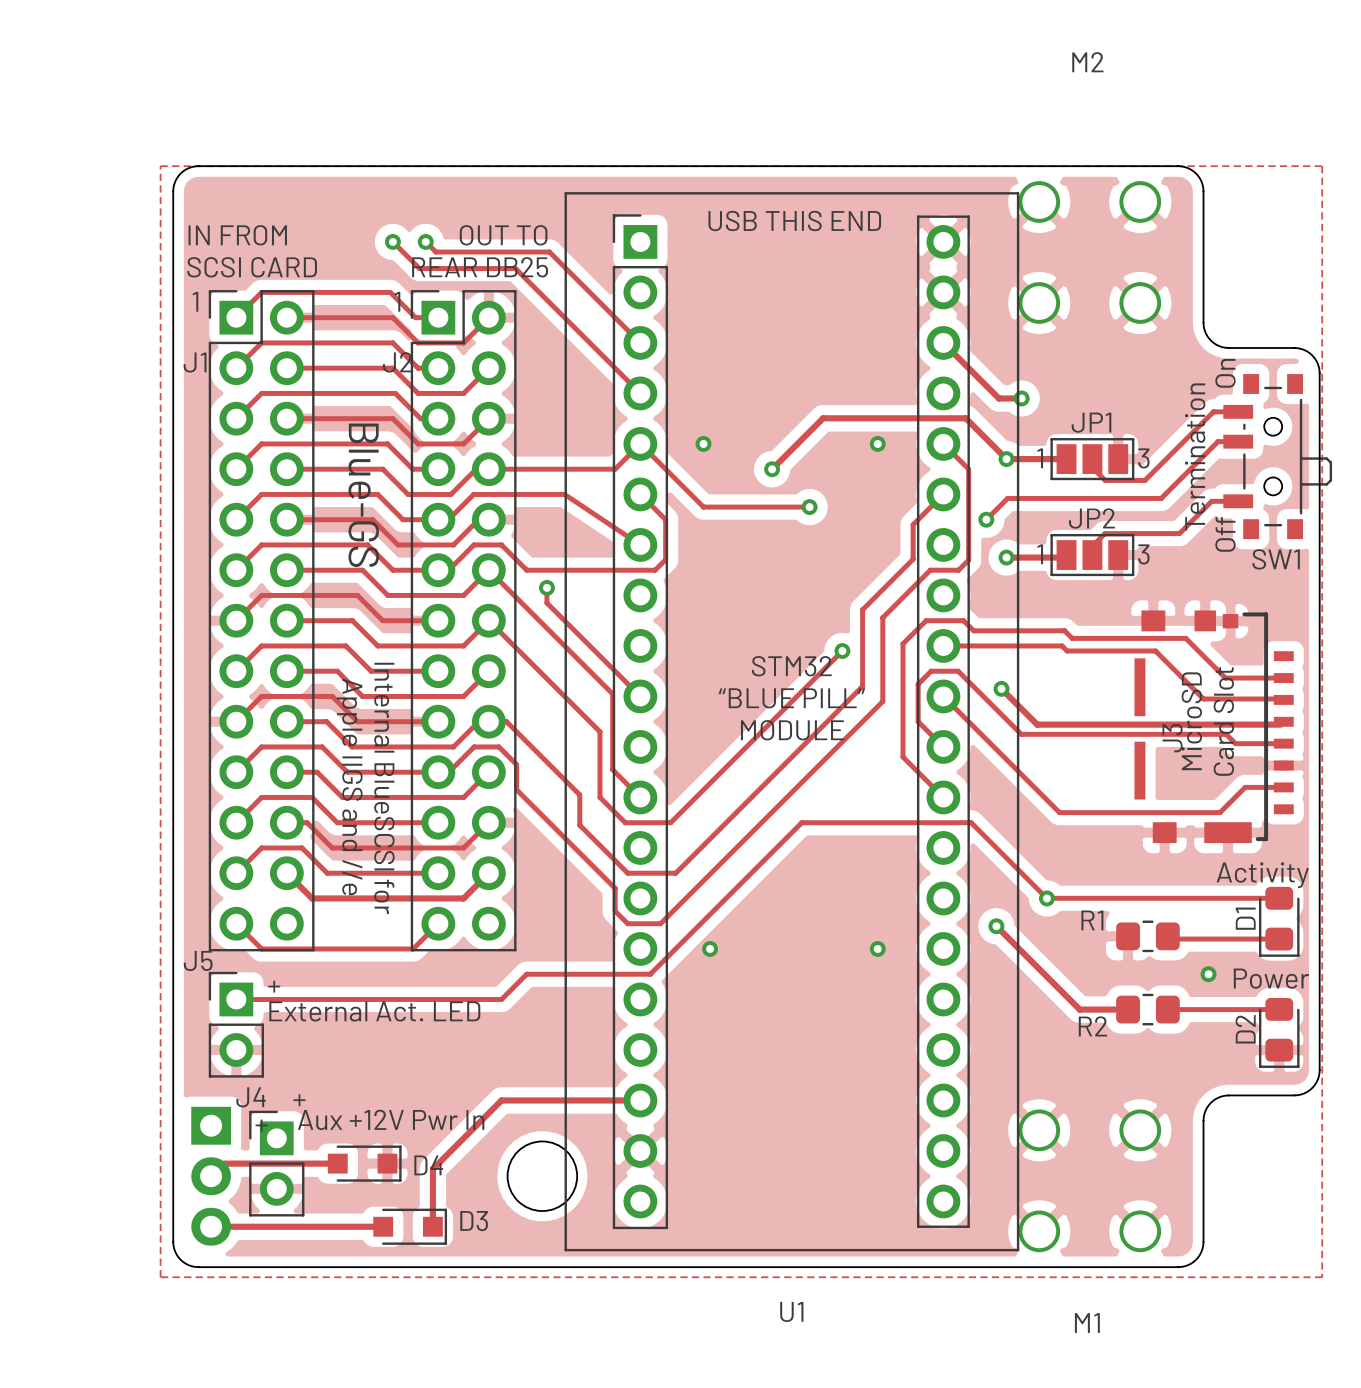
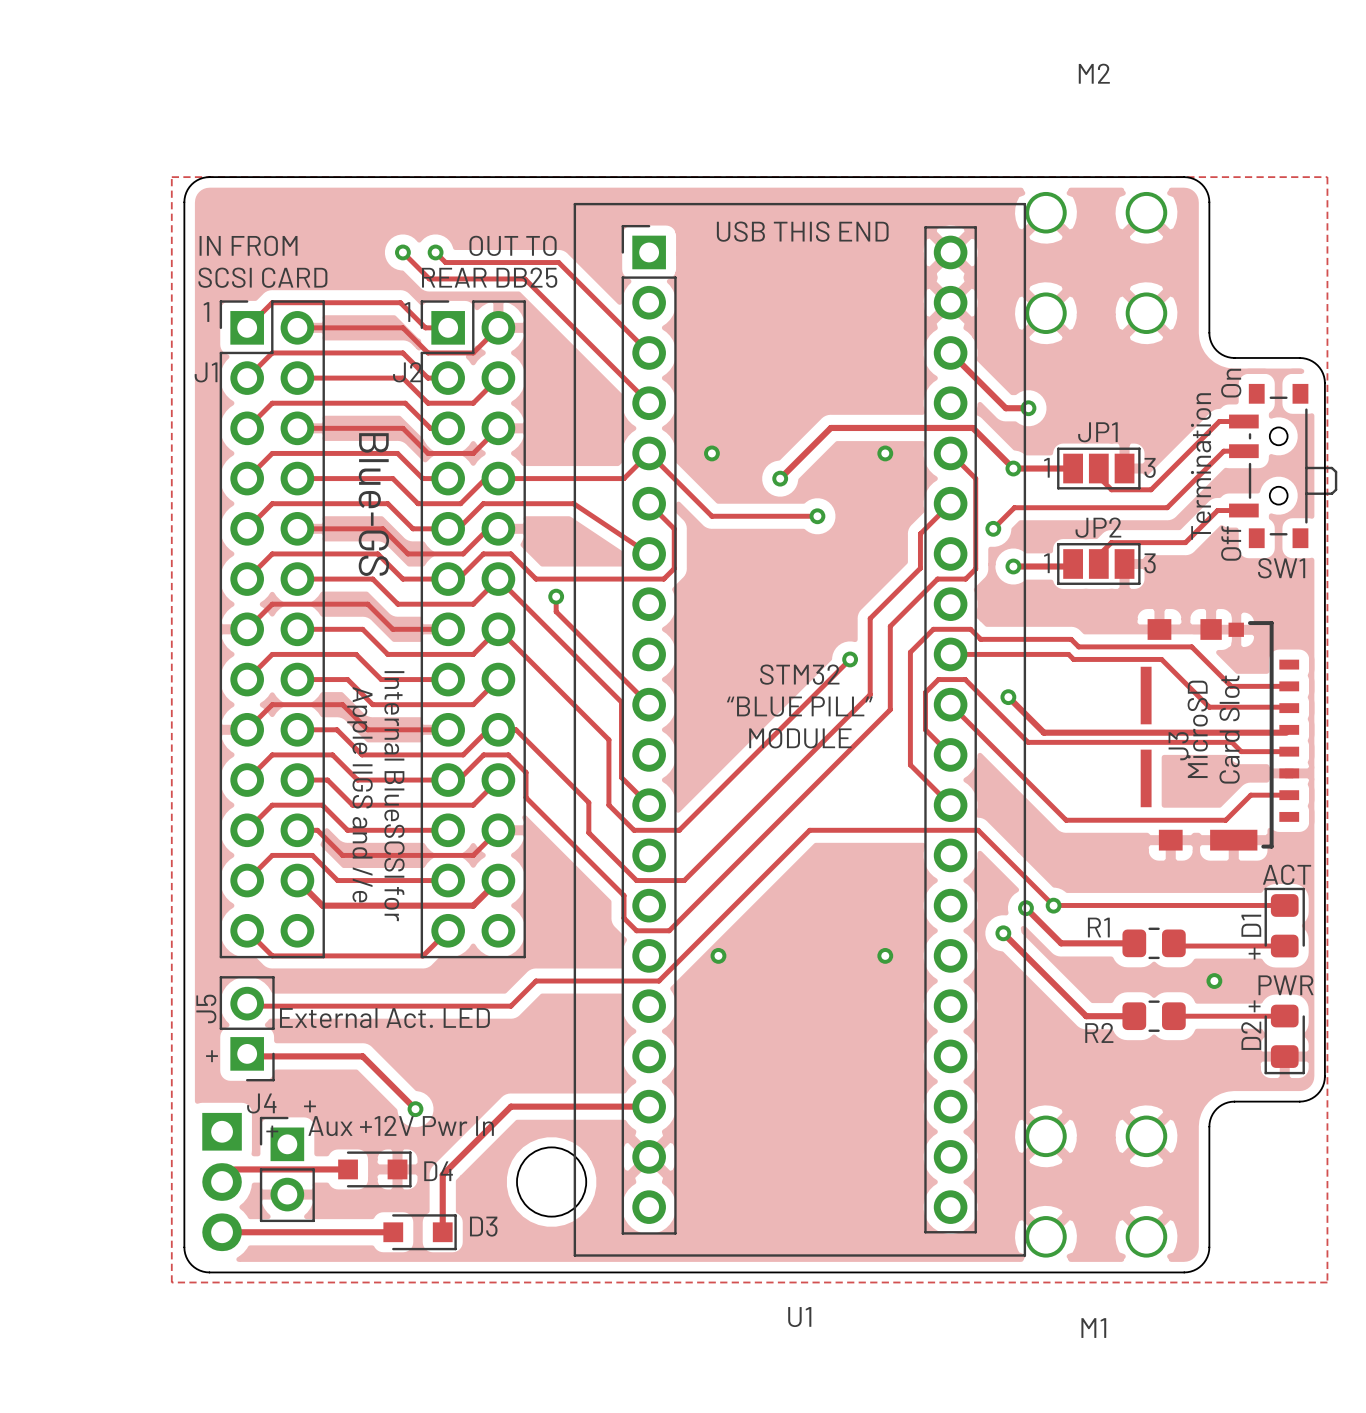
text: Activity (1262, 875) -> ACT (1287, 874)
track: none -> (1025, 908) (1061, 943) (1134, 943)
via: none -> (1025, 908)
D1 rotation: 0° (1279, 921) -> 180° (1284, 922)
text: none -> + (1254, 953)
J5 name position: J5 (198, 960) -> J5 (206, 1008)
text: Power (1271, 978) -> PWR (1286, 985)
text position: + (274, 986) -> + (212, 1056)
text: none -> + (1254, 1006)
J5 rotation: 0° (236, 1024) -> 180° (247, 1028)
track: none -> (247, 1056) (362, 1056) (415, 1109)
via: none -> (415, 1109)

